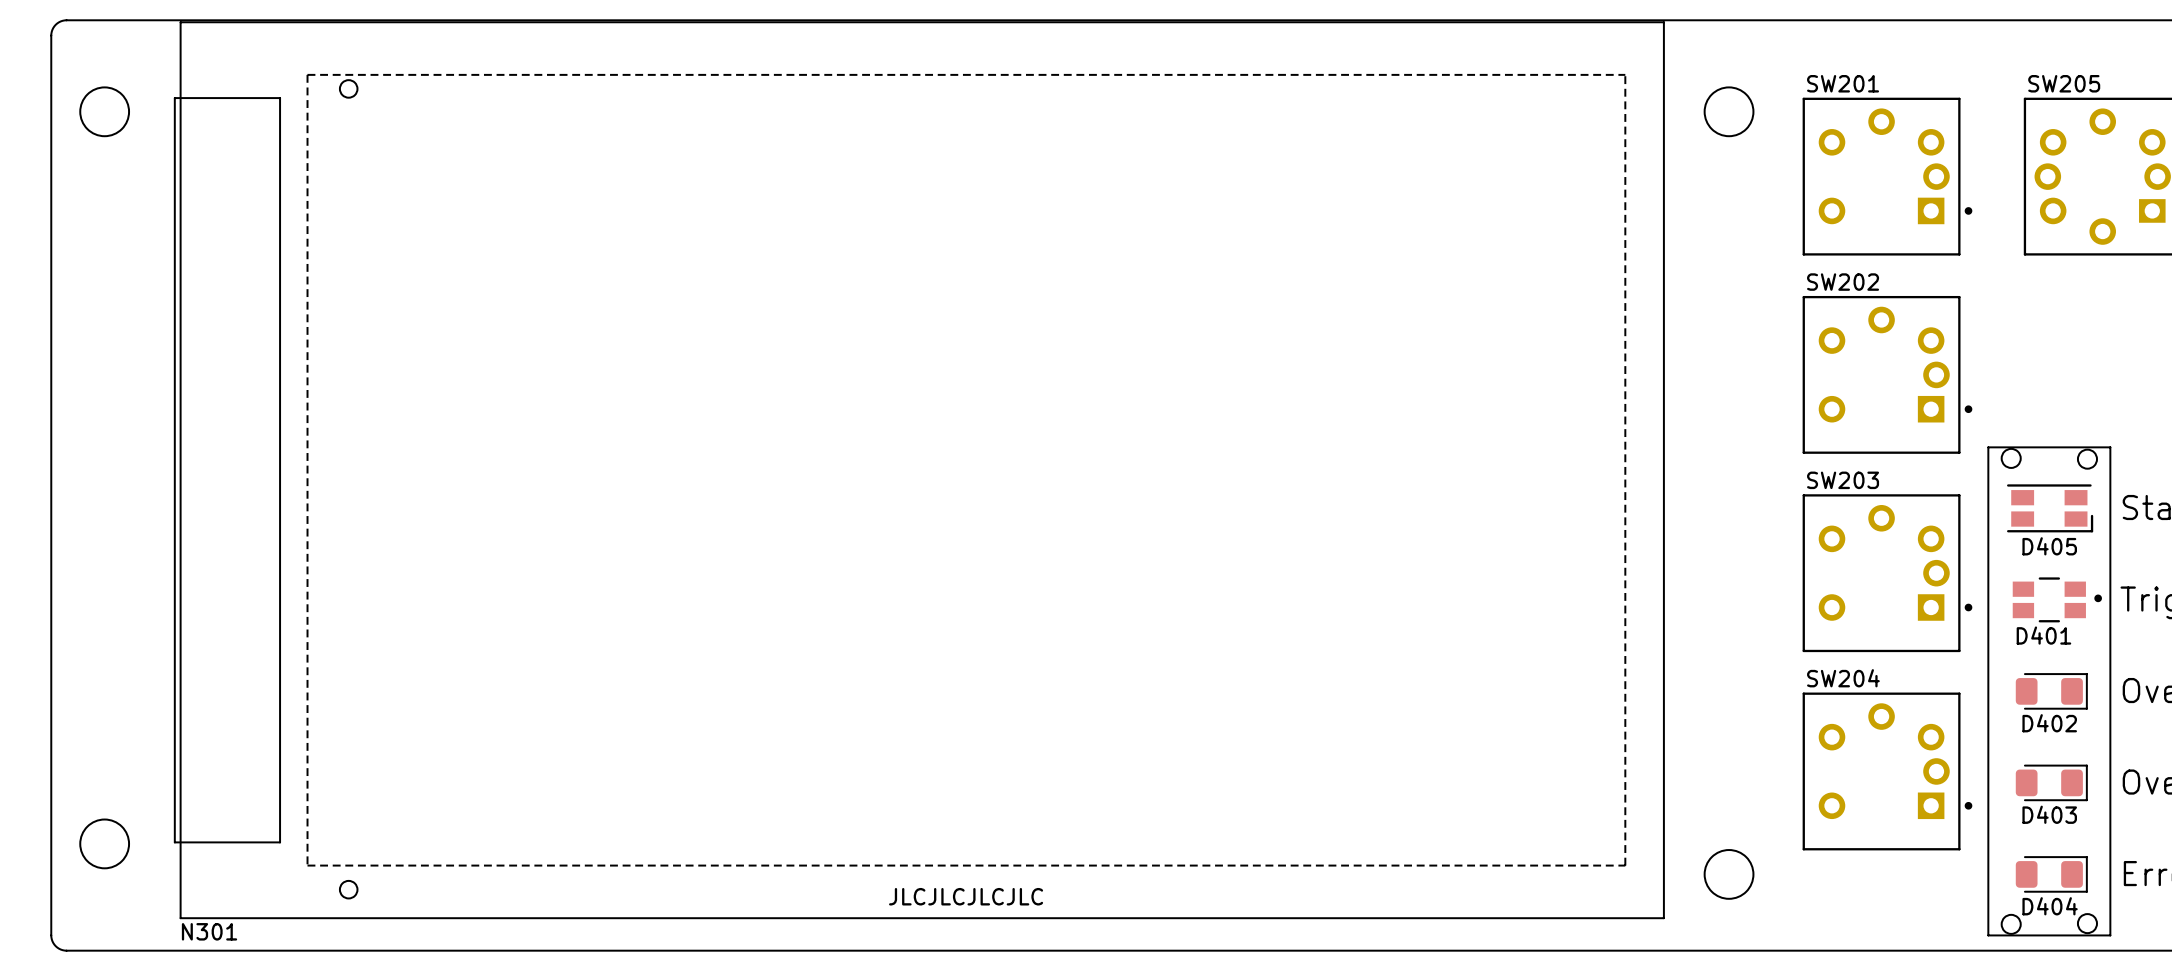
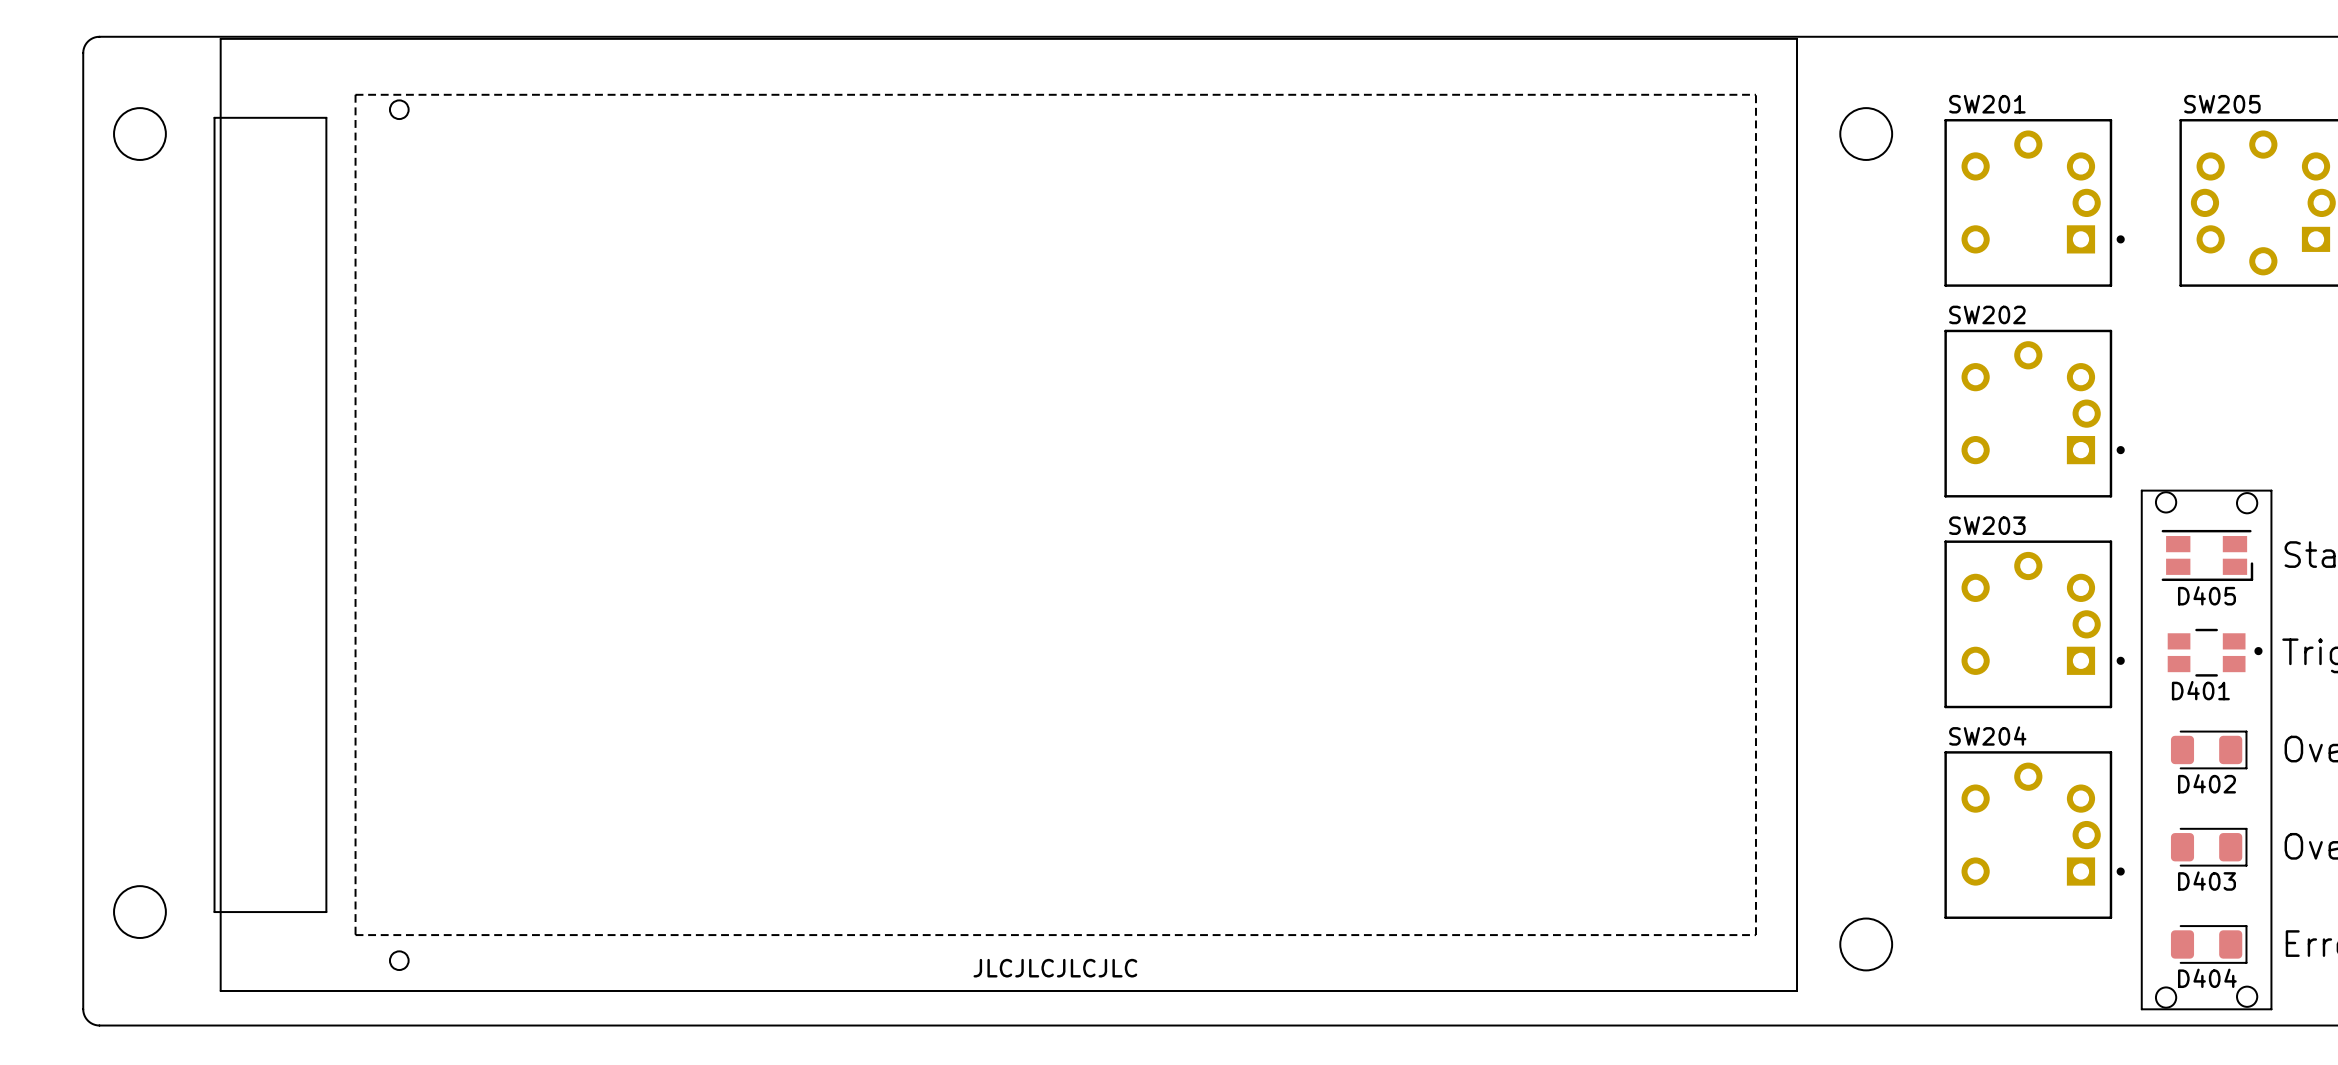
drawing: none -> [213, 38, 1798, 992]
N301: (919, 470) -> none

